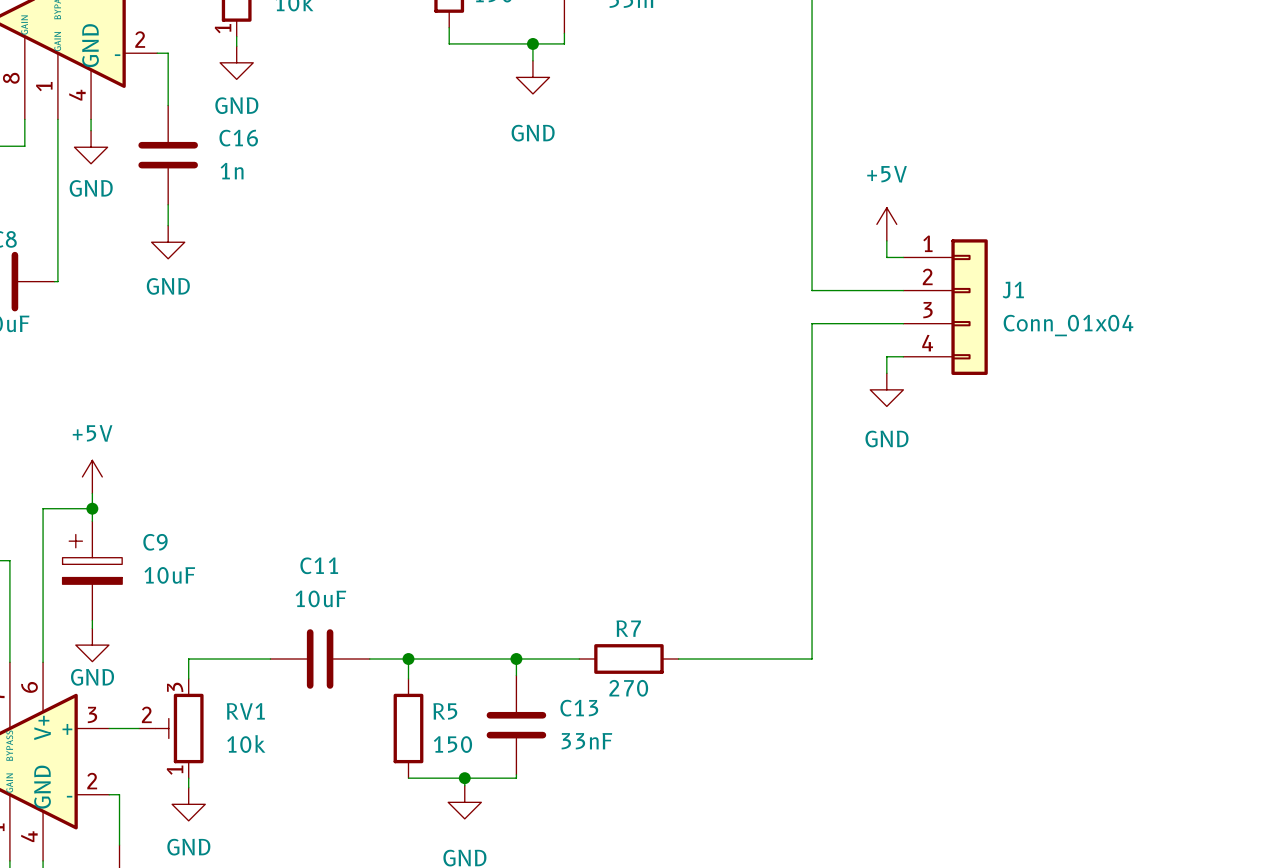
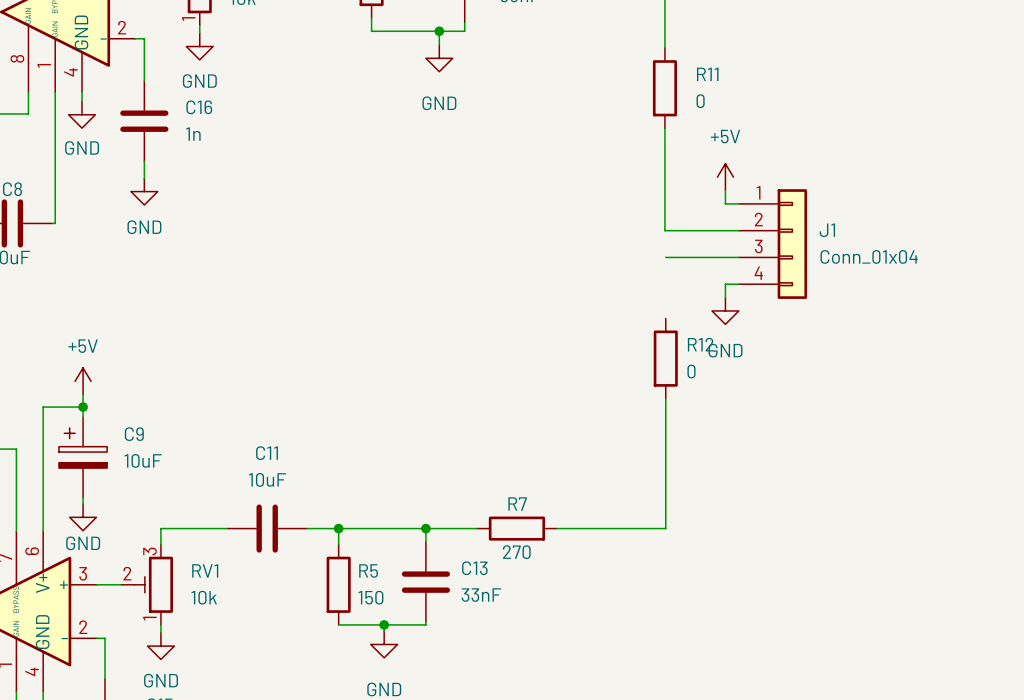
wire: (812, 64) (812, 164) -> none
R11: none -> 0 (664, 88)
wire: (813, 323) (812, 659) -> (665, 398) (664, 528)
R12: none -> 0 (665, 358)

